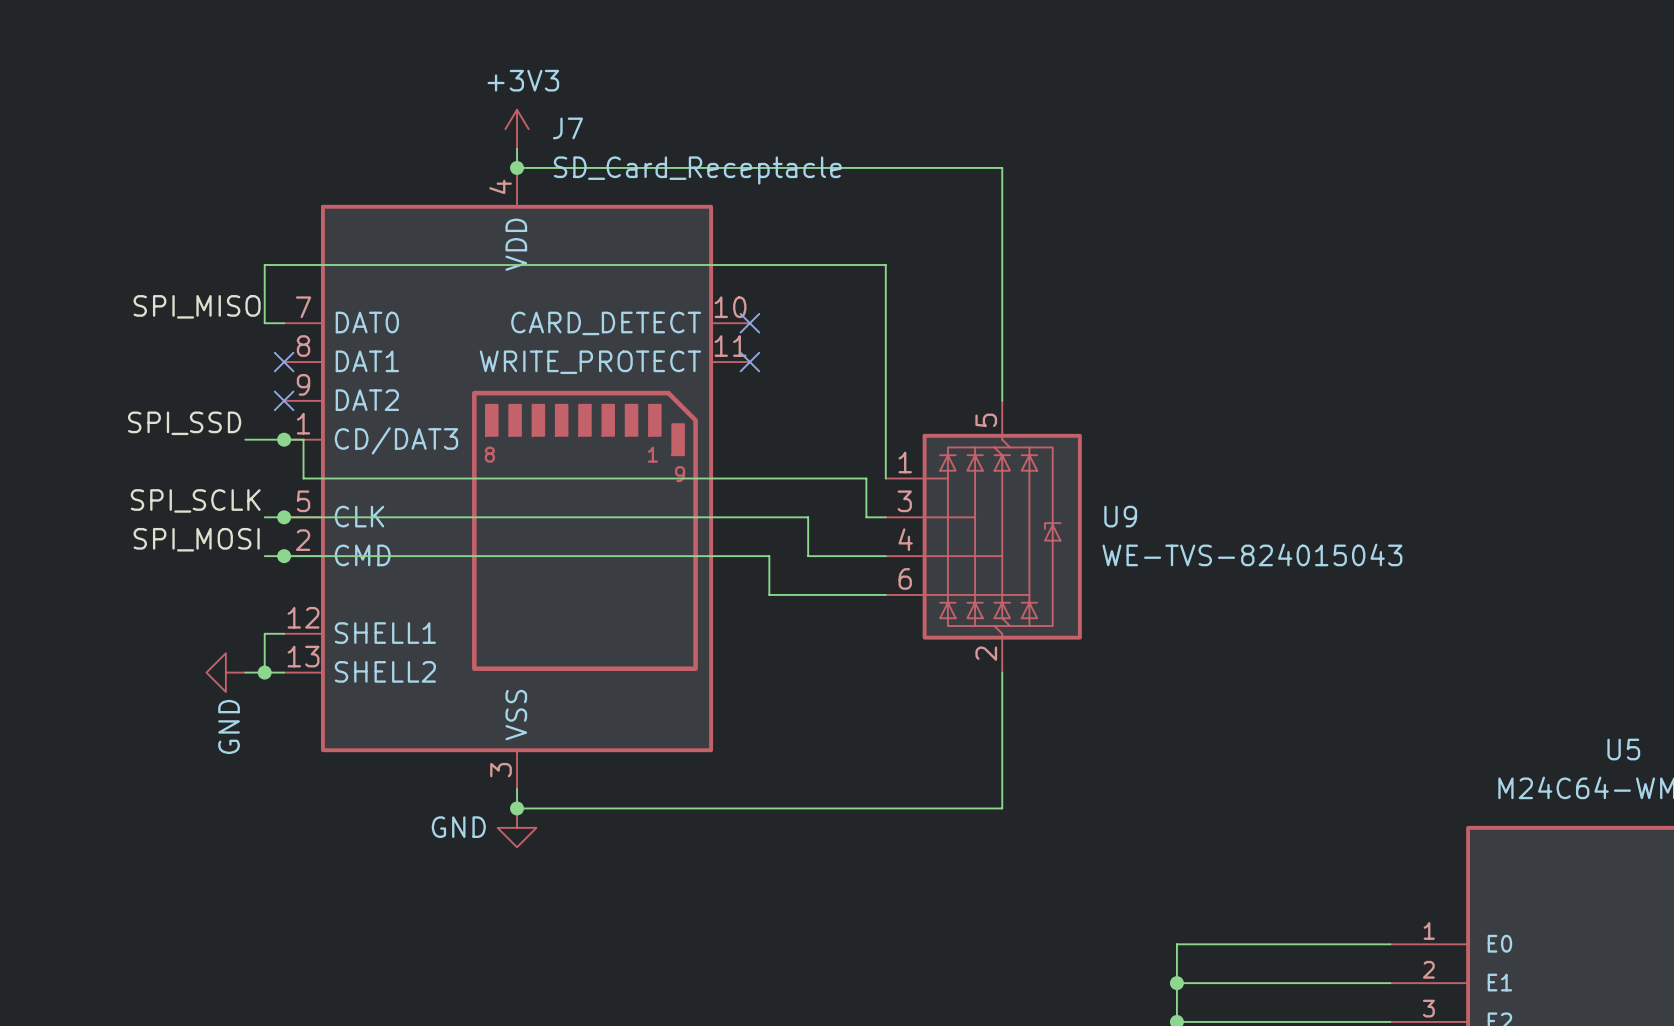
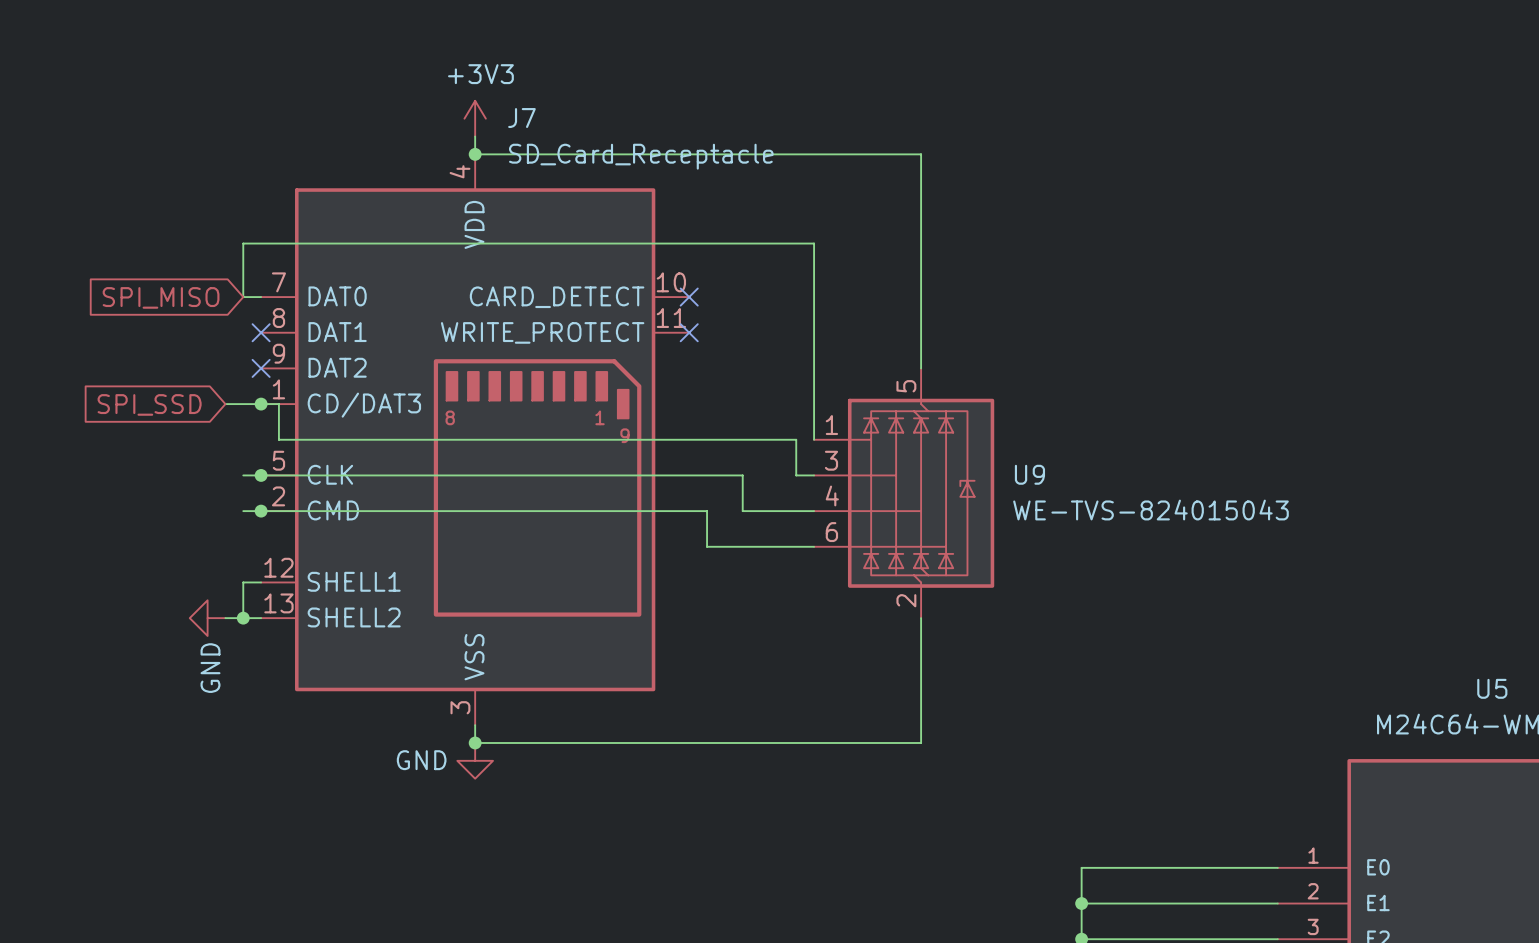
label: SPI_MISO (197, 306) -> none
global label: none -> SPI_MISO (161, 297)
label: SPI_SSD (184, 423) -> none
global label: none -> SPI_SSD (149, 404)
label: SPI_SCLK (195, 500) -> none
label: SPI_MOSI (196, 539) -> none

